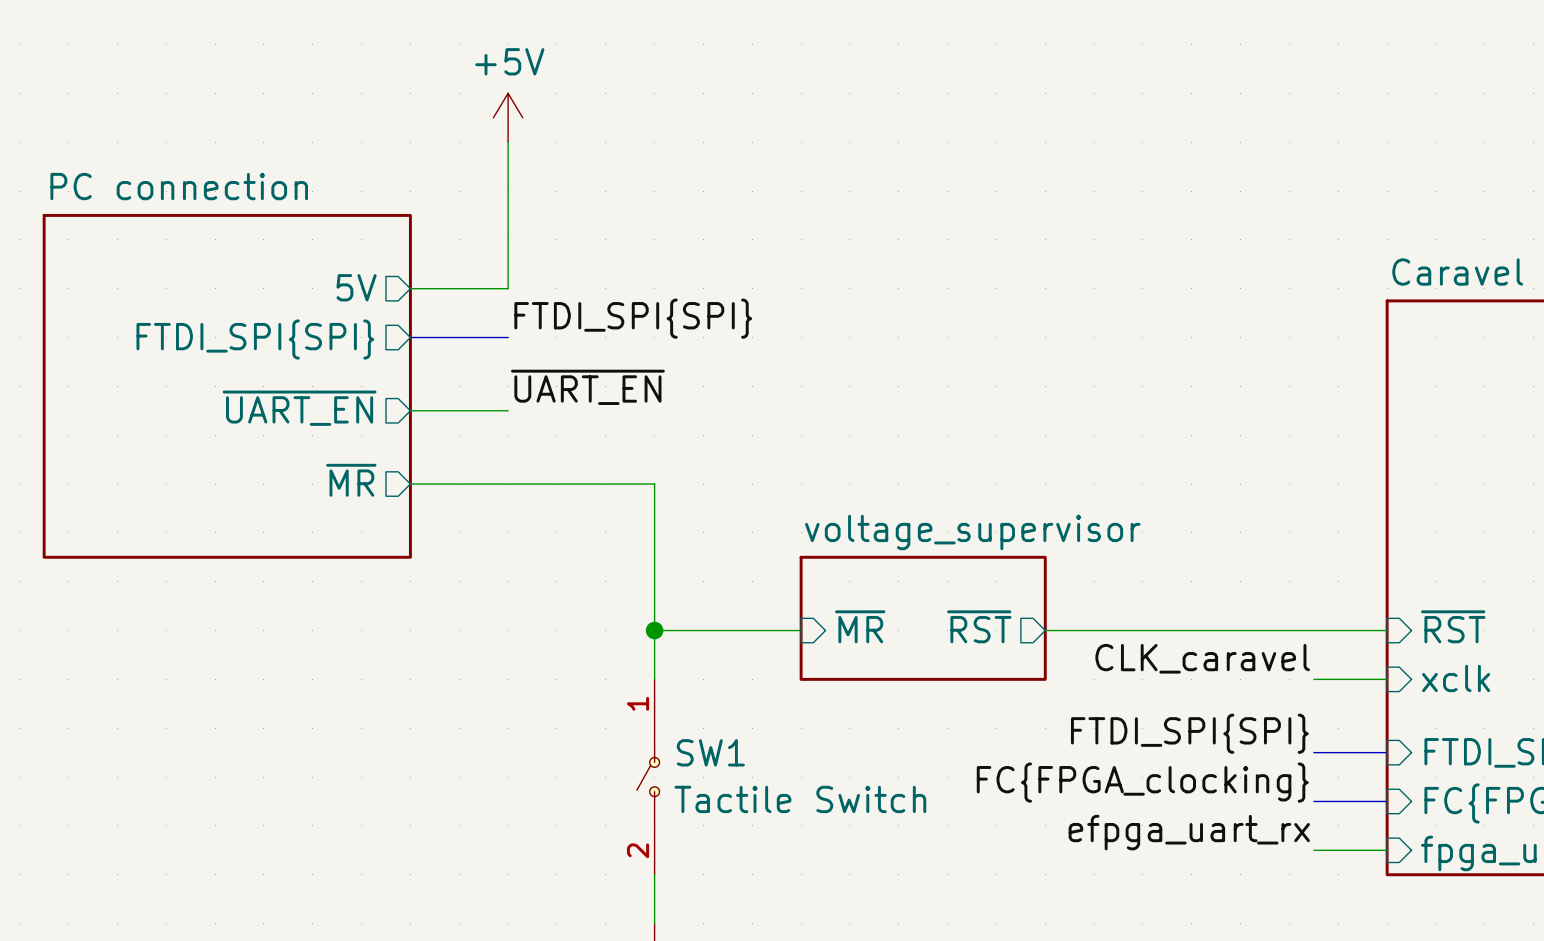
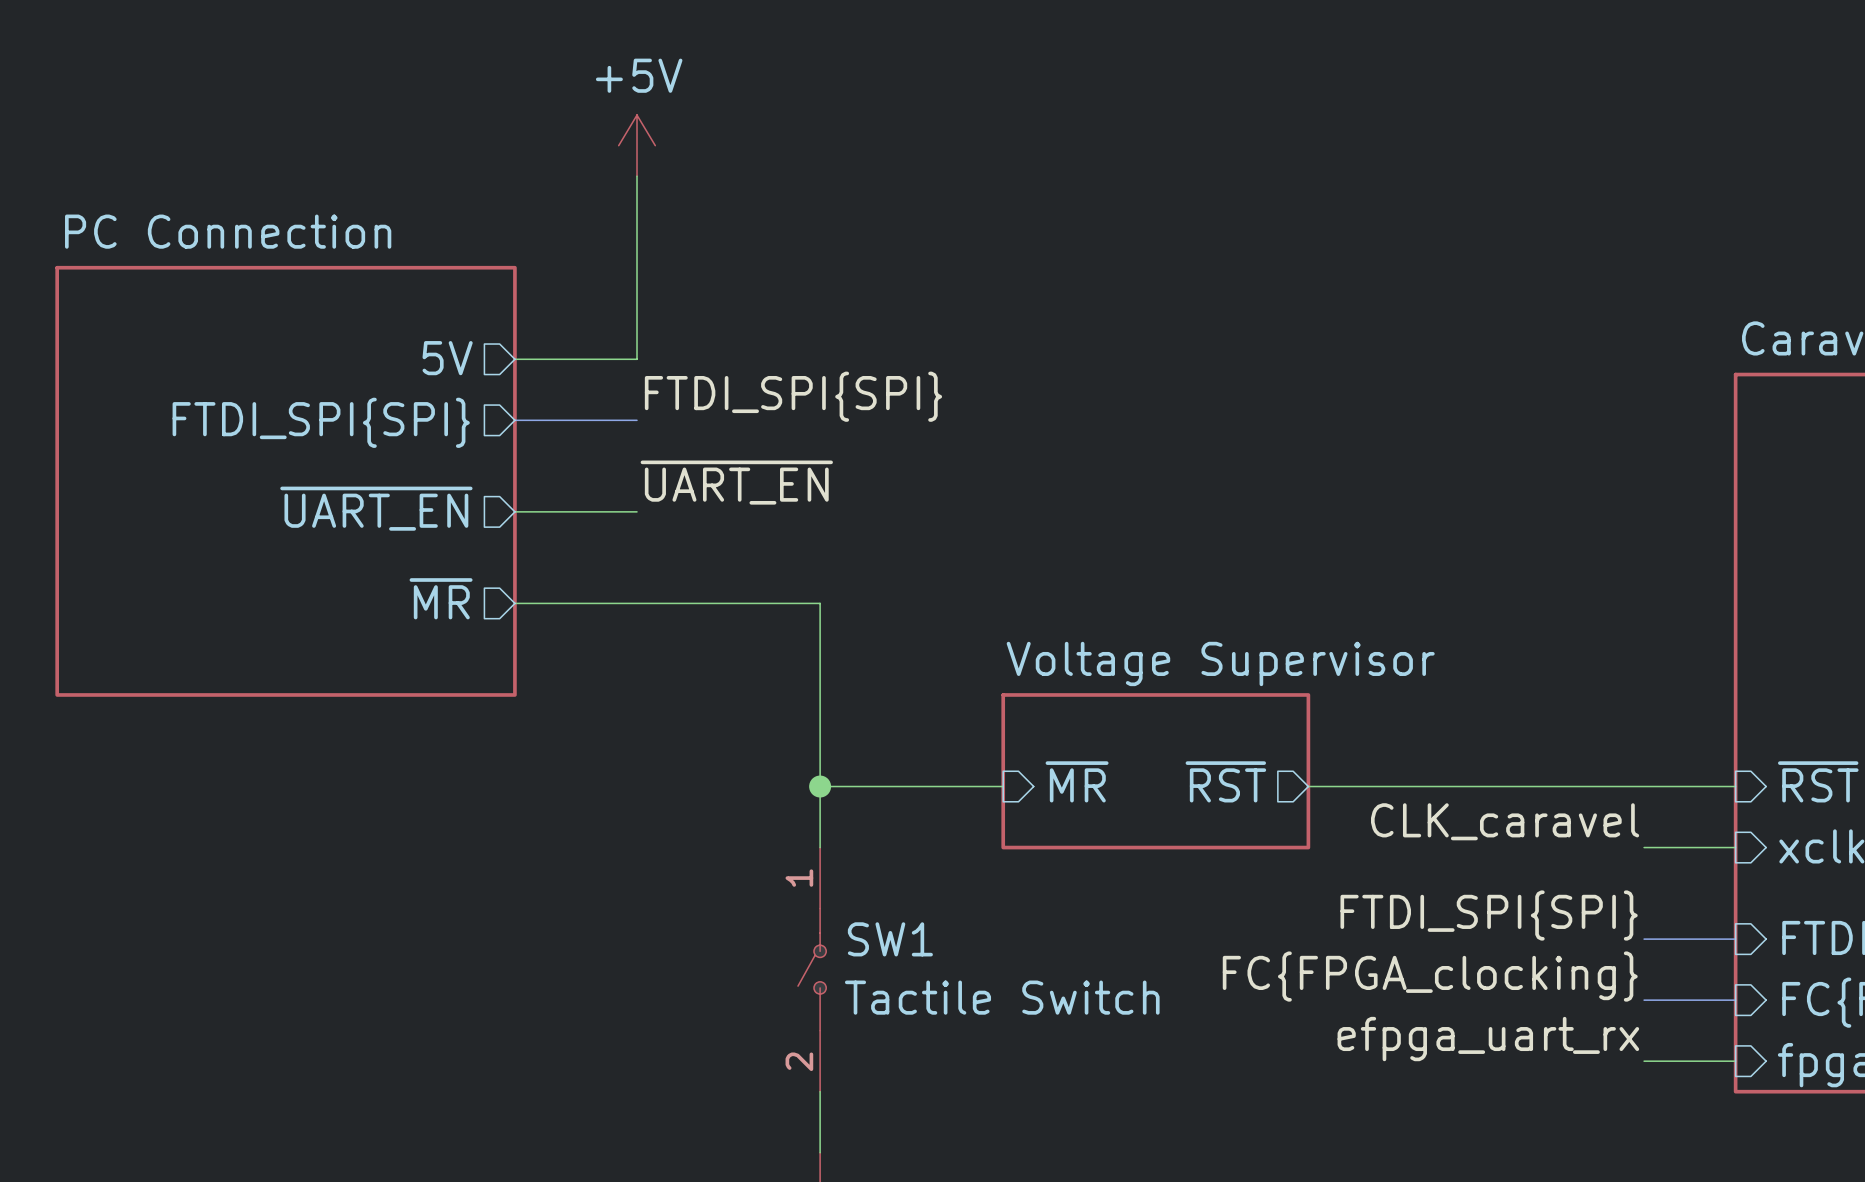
sheet PC connection name: PC connection (179, 186) -> PC Connection (228, 231)
sheet voltage_supervisor name: voltage_supervisor (972, 532) -> Voltage Supervisor (1220, 663)

